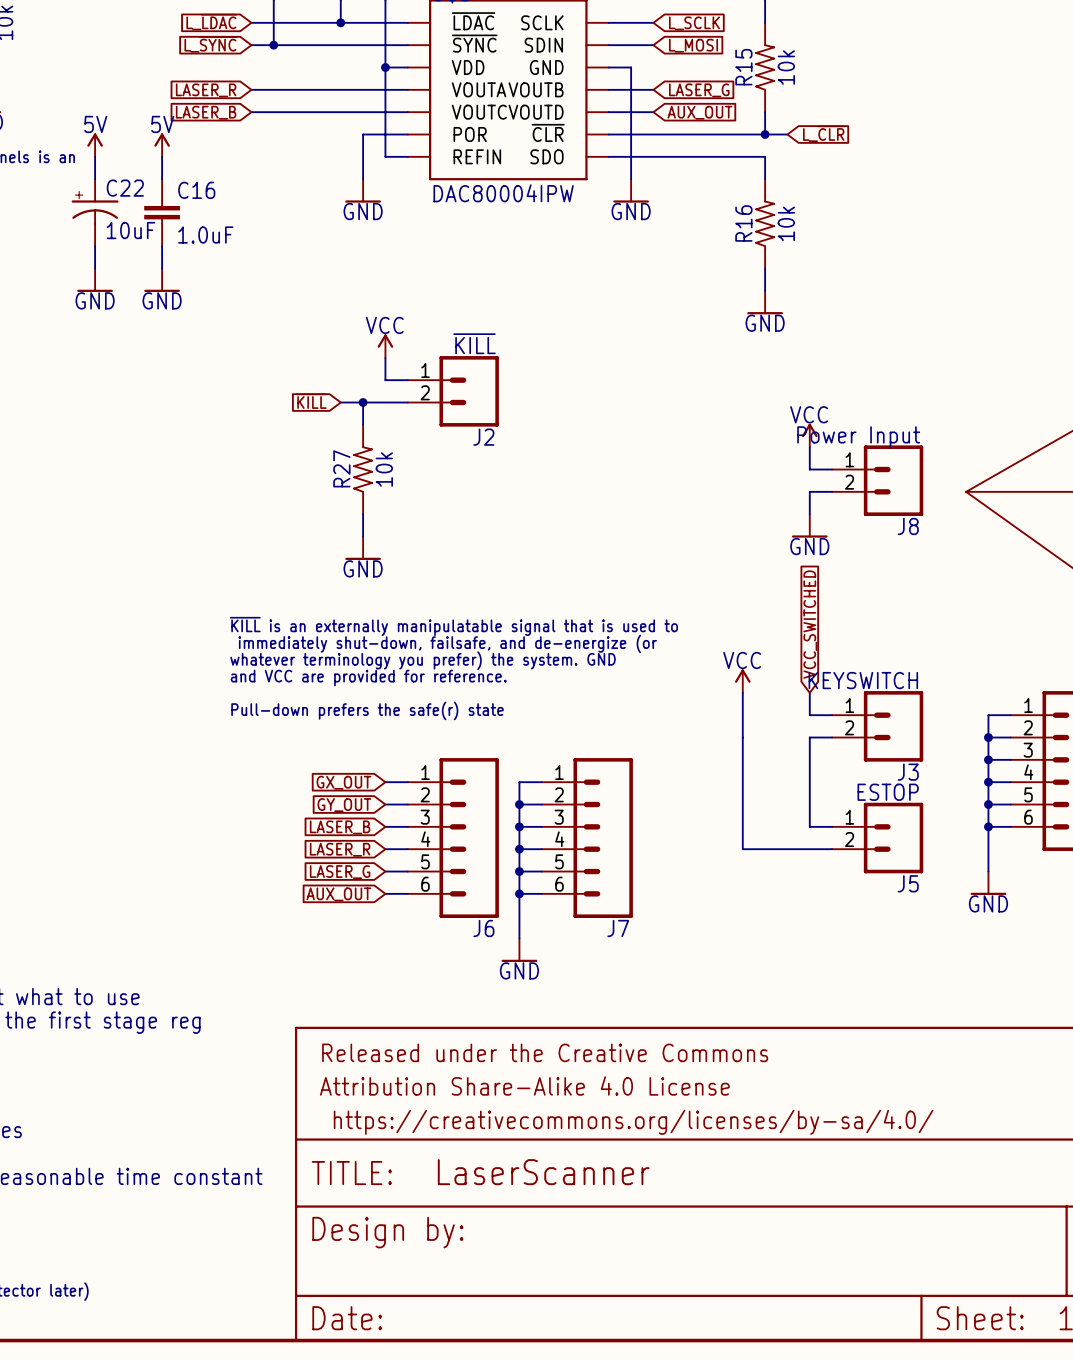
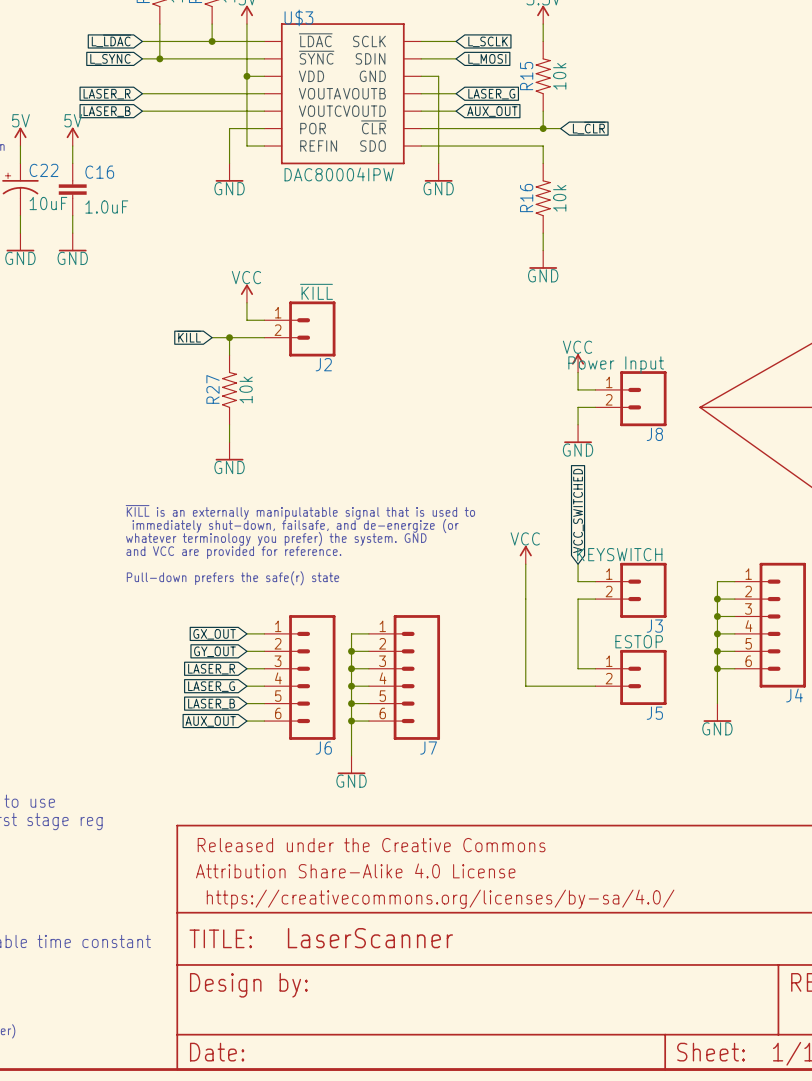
global label: LASER_B (340, 827) -> LASER_R (211, 669)
global label: LASER_R (340, 849) -> LASER_G (211, 686)
global label: LASER_G (340, 872) -> LASER_B (211, 704)

